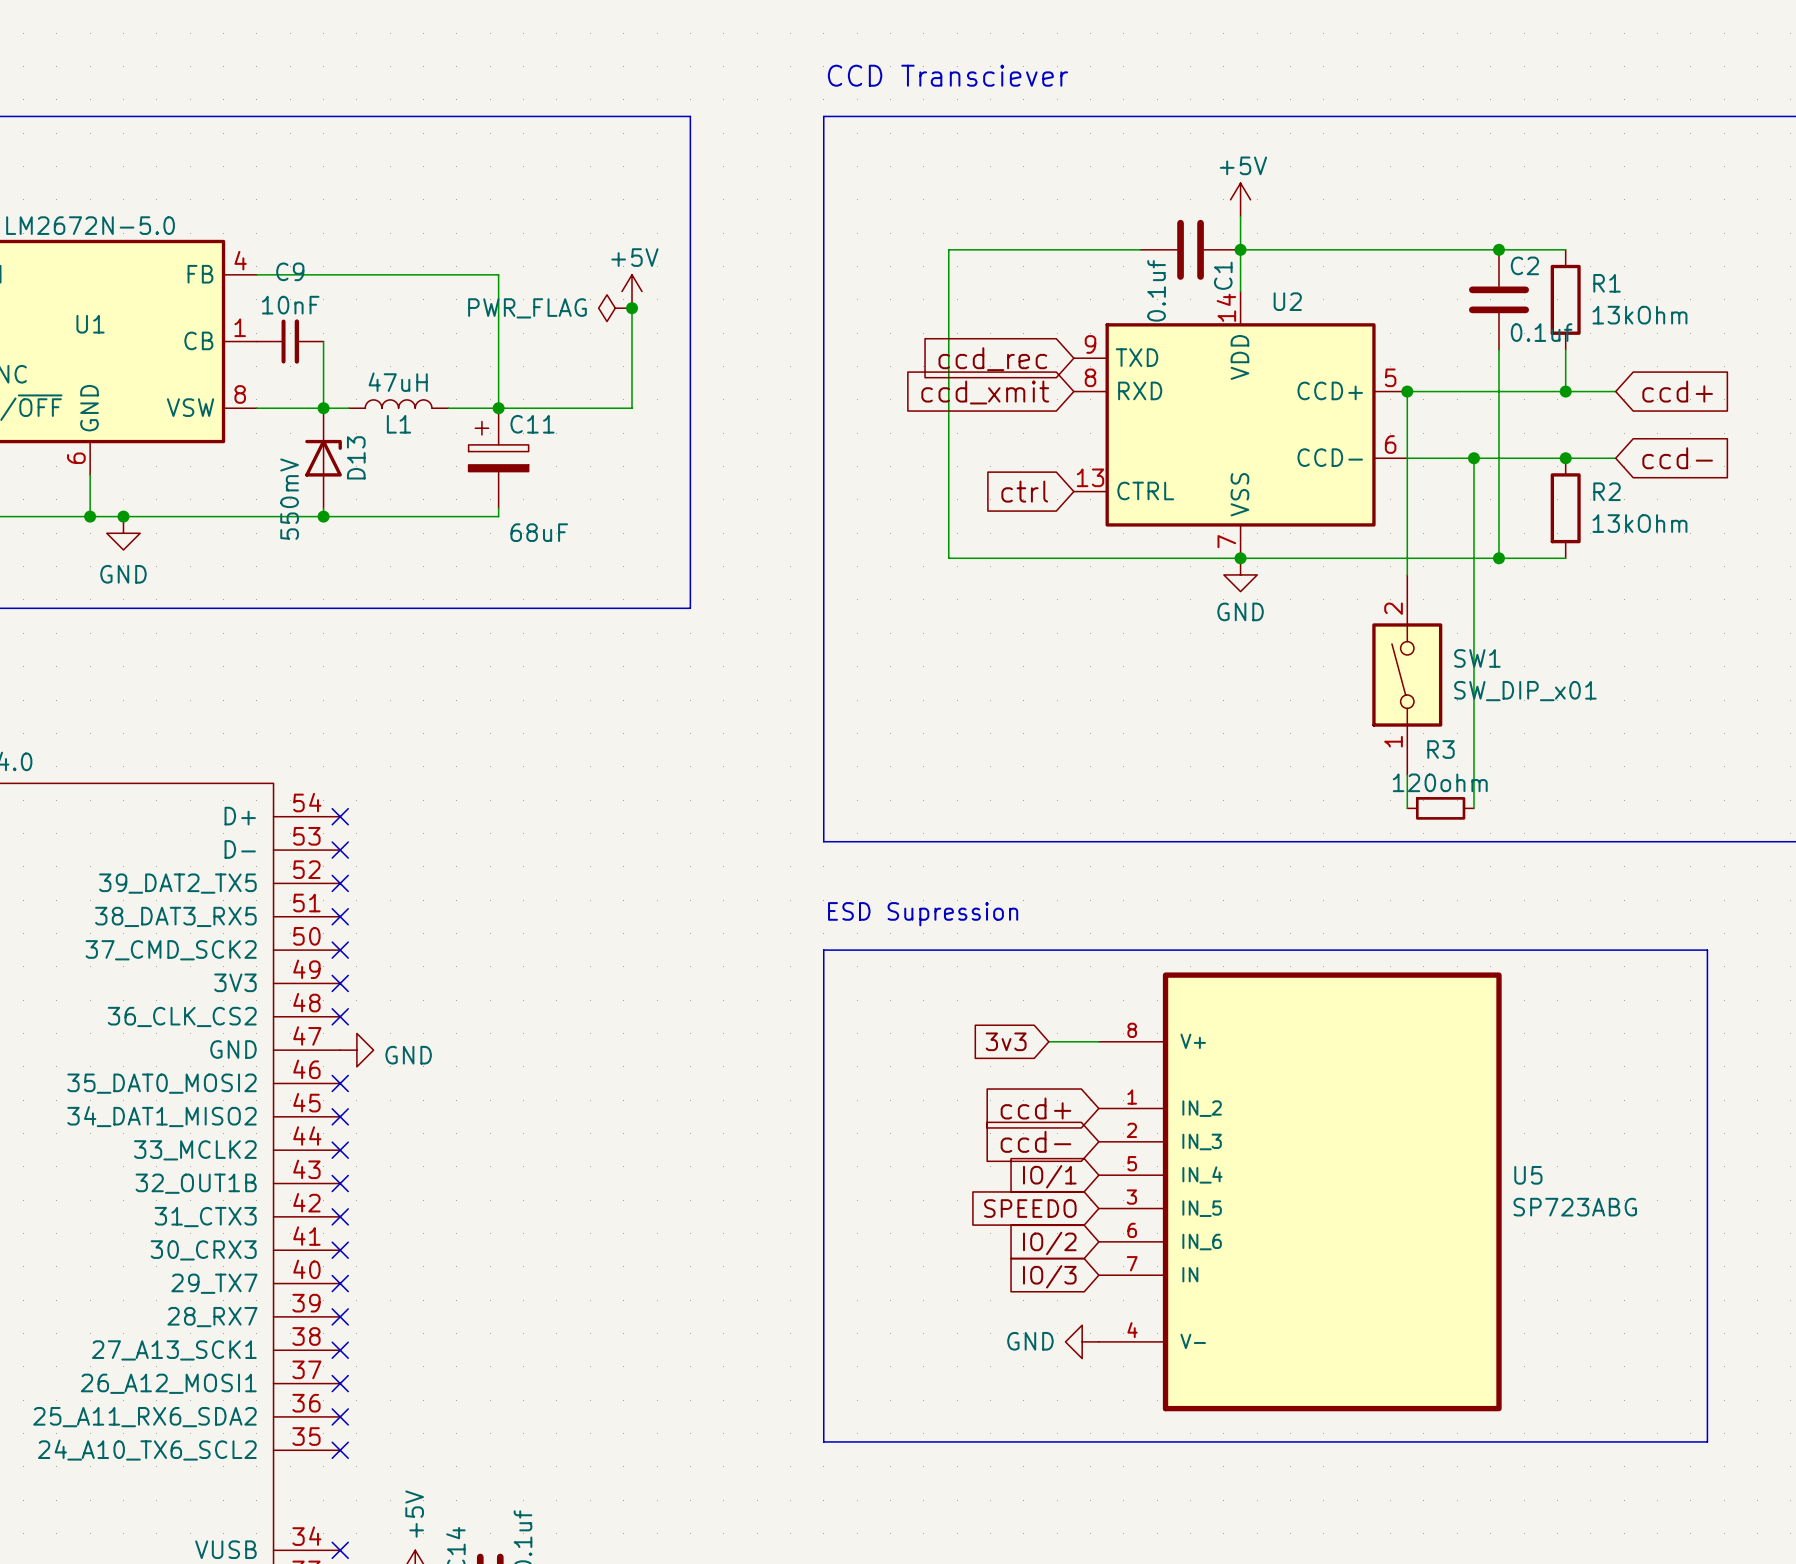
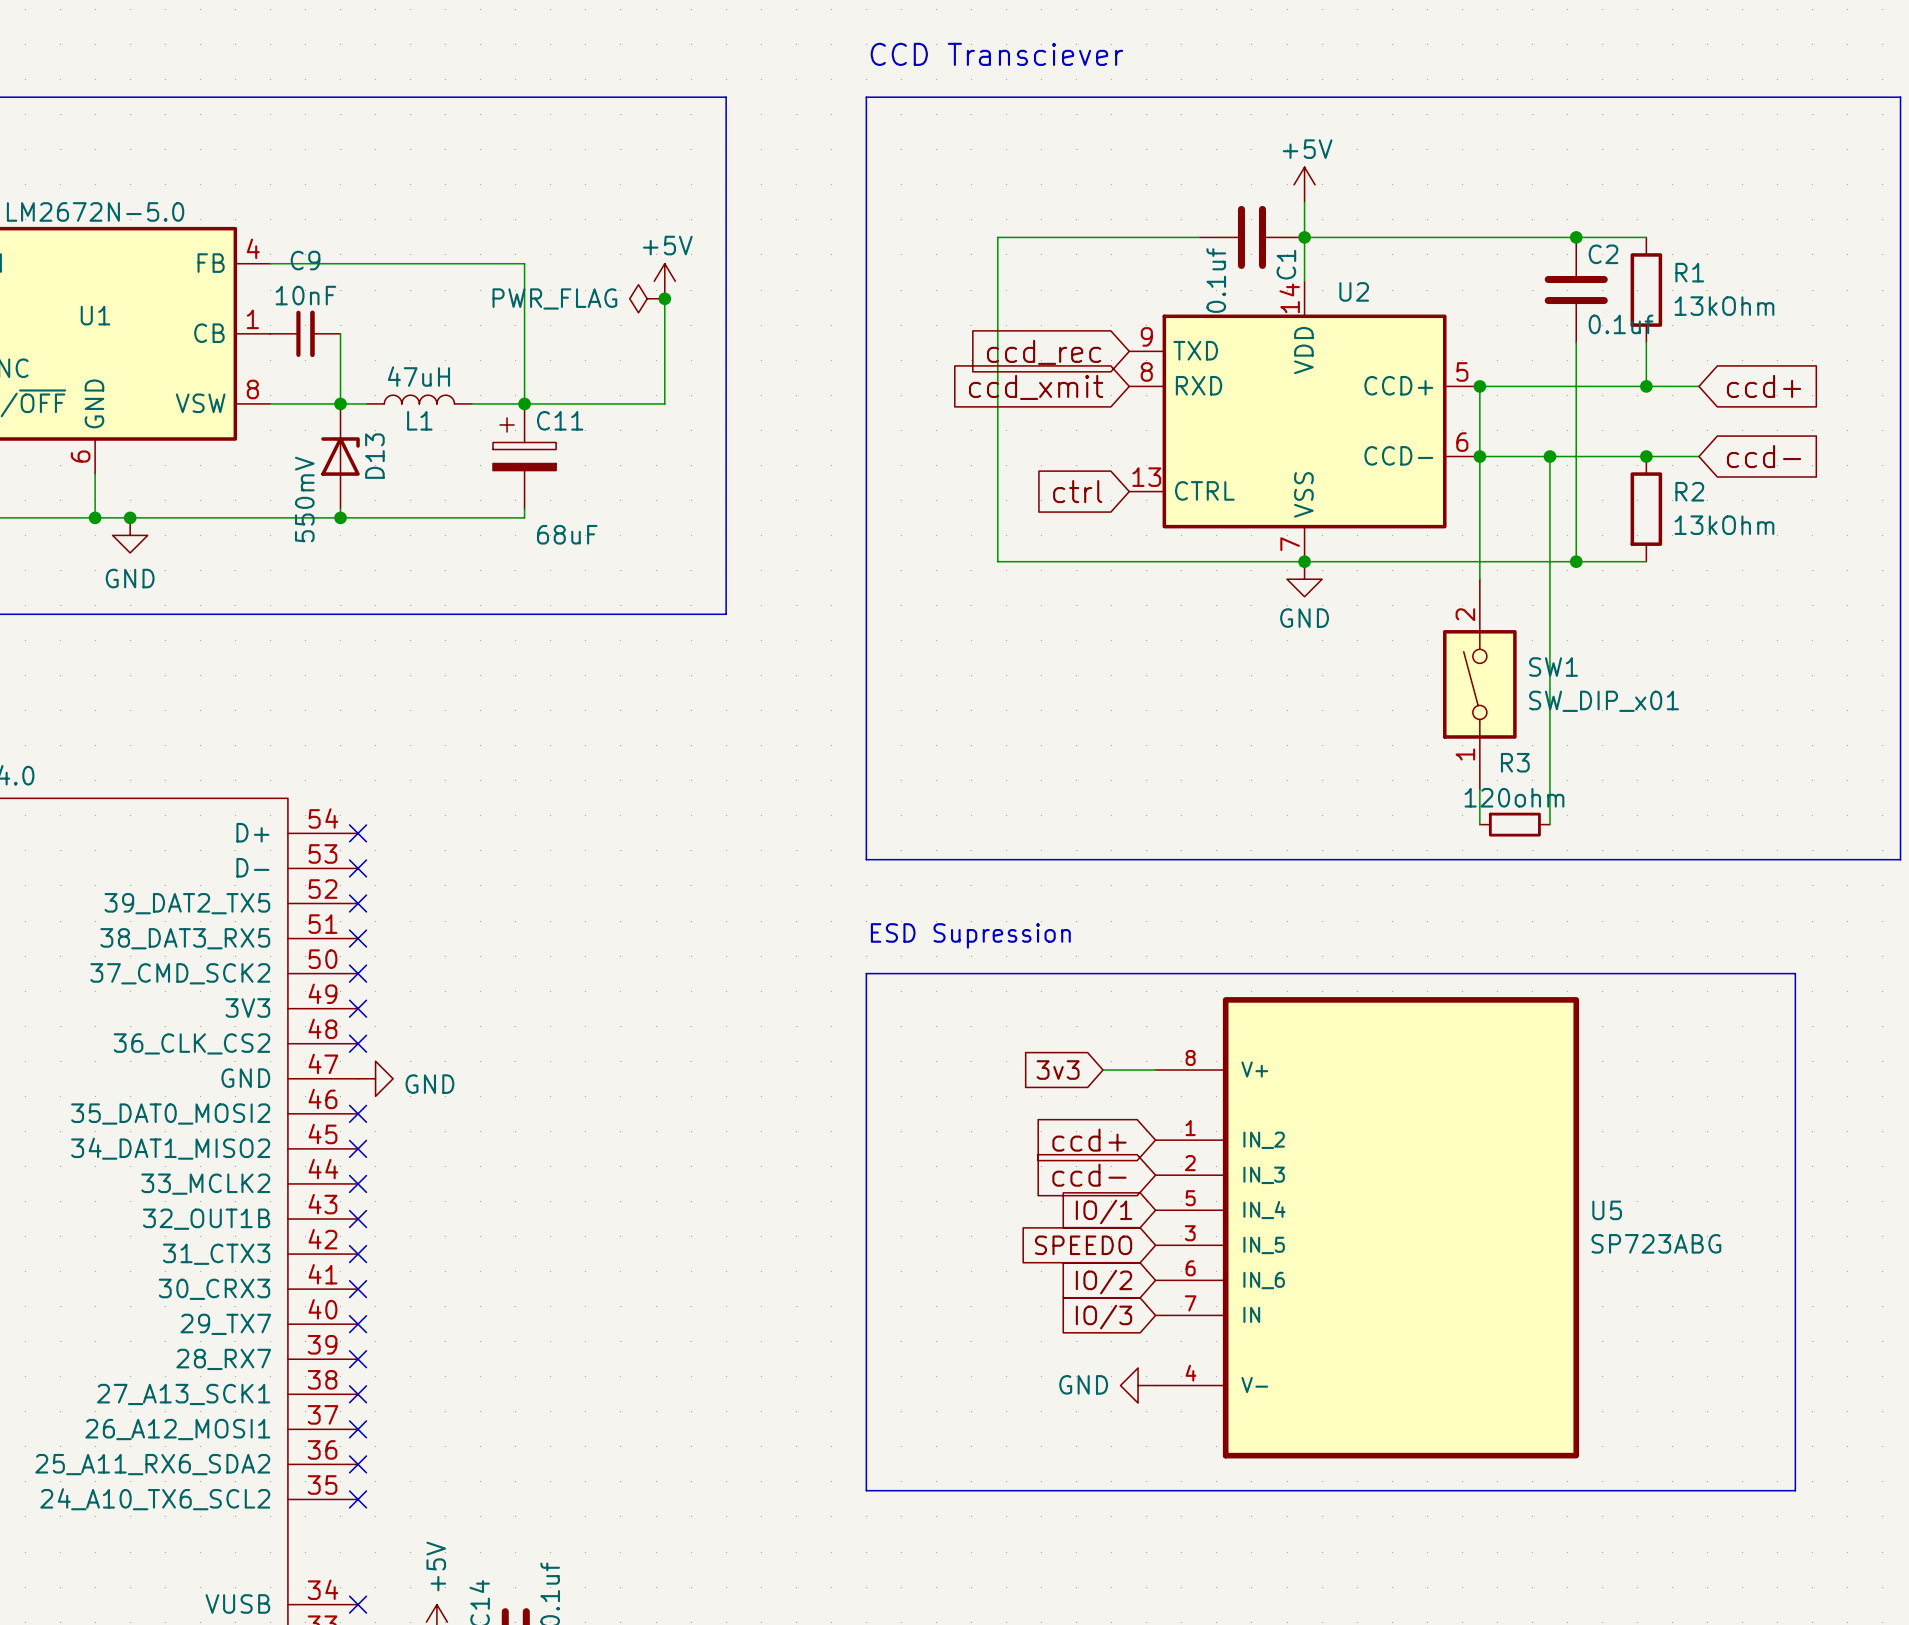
junction: none -> (1479, 456)

